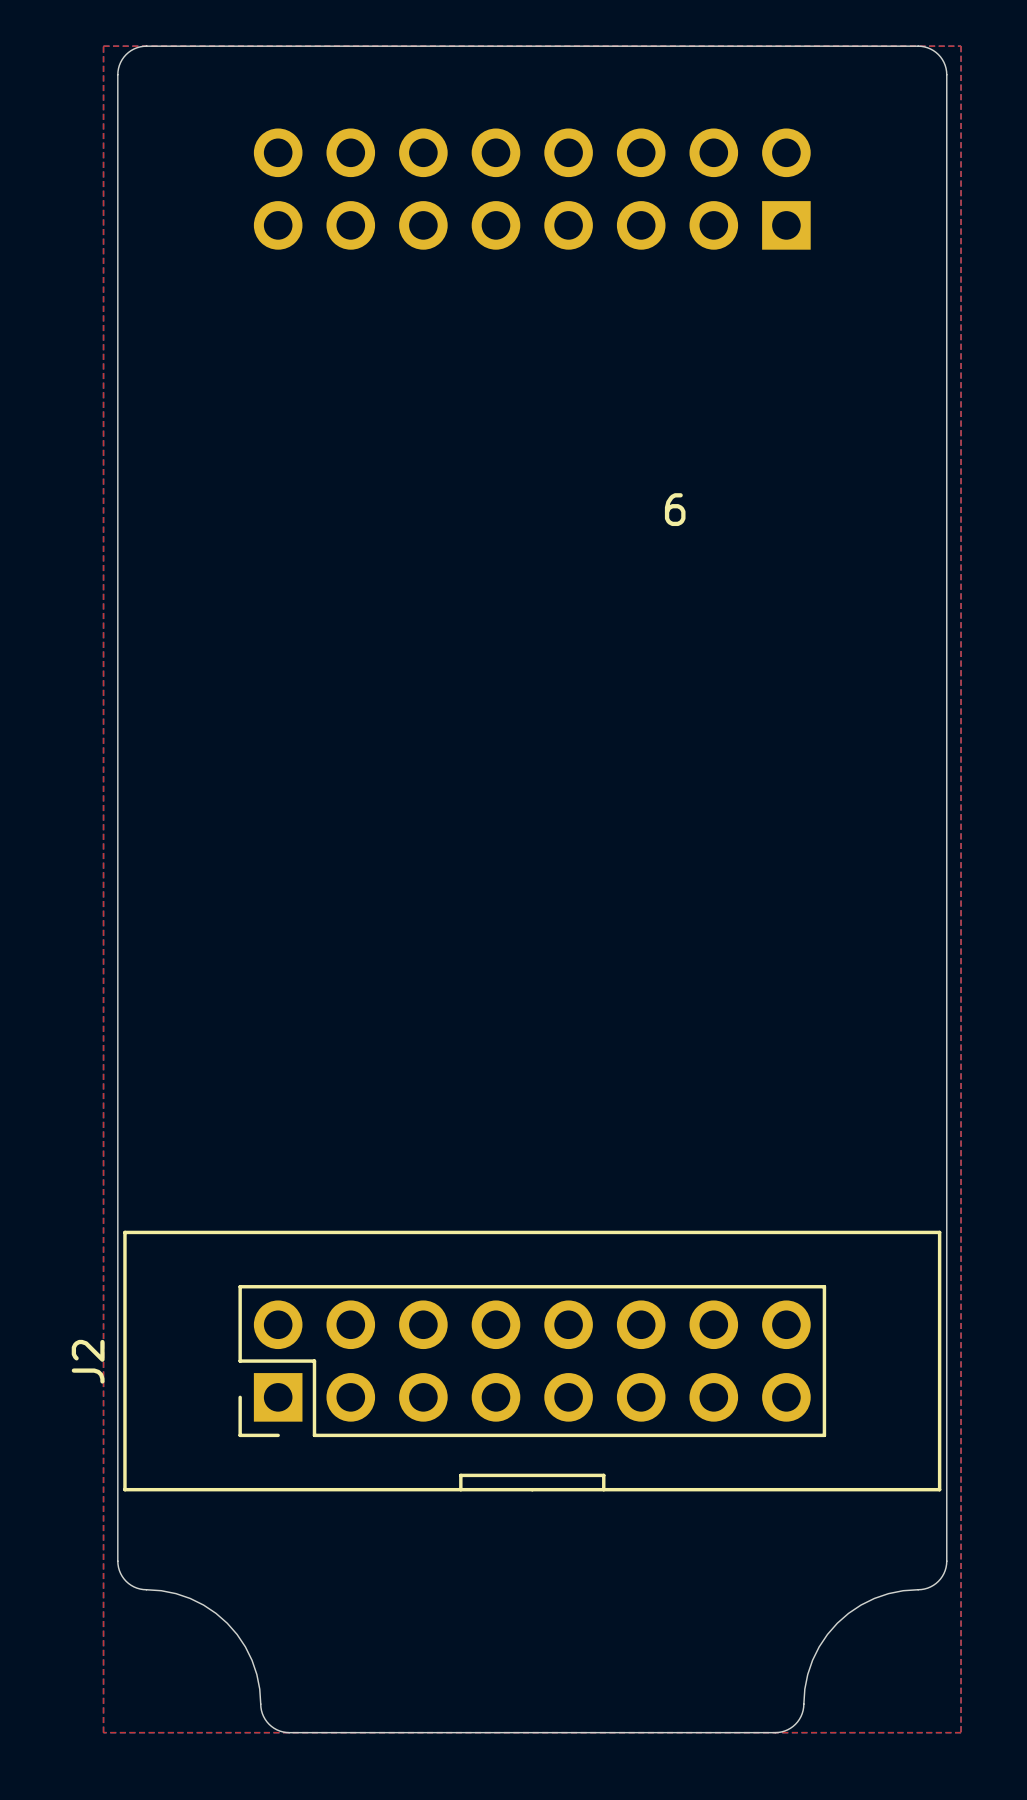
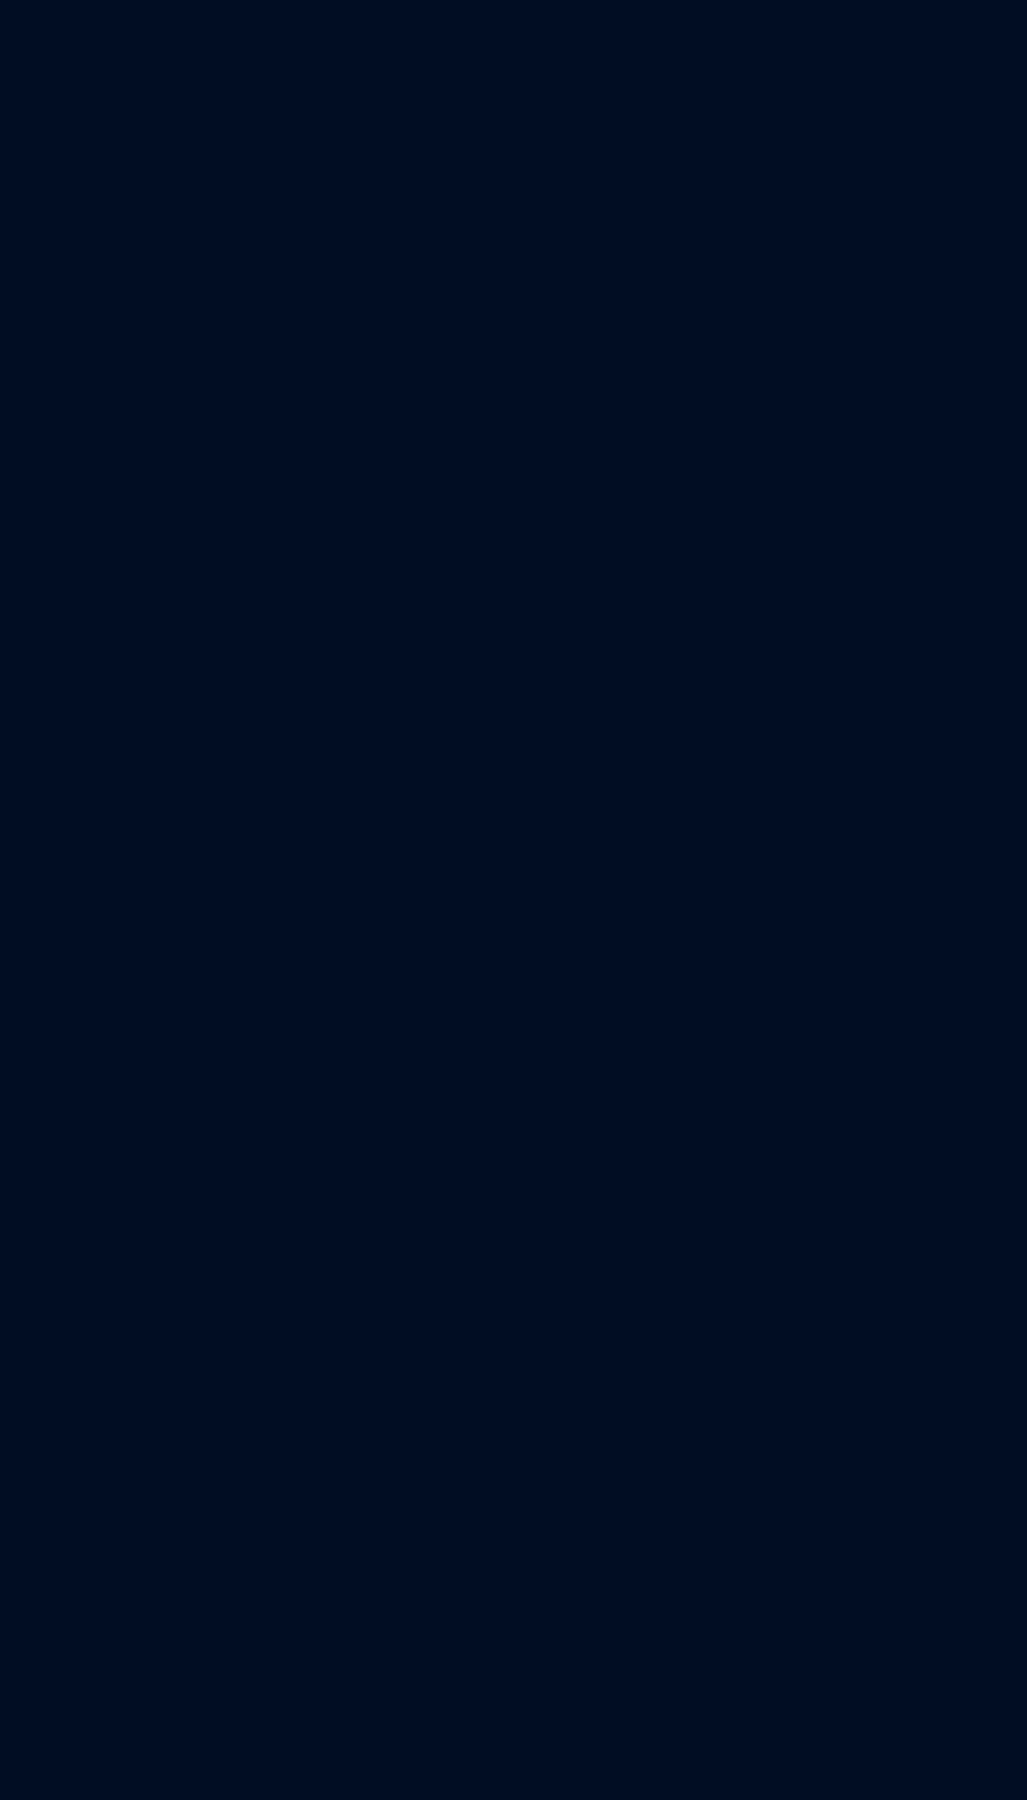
top zone outline: (103, 46) (103, 1732) (961, 1732) (961, 46) (103, 46) -> none
board edge: (146, 46) (918, 46) (927, 47) (936, 52) (945, 65) (946, 74) (946, 1564) (940, 1578) (930, 1586) (888, 1593) (874, 1598) (861, 1605) (837, 1623) (819, 1646) (812, 1660) (807, 1674) (801, 1716) (795, 1724) (784, 1731) (775, 1732) (282, 1731) (271, 1726) (263, 1716) (256, 1674) (252, 1660) (245, 1646) (227, 1623) (203, 1605) (190, 1598) (175, 1593) (134, 1586) (126, 1581) (119, 1570) (117, 1561) (117, 74) (120, 62) (126, 54) (134, 49) (146, 46) -> none
part: (532, 189) -> none
text: 6 (675, 509) -> none
J2: (532, 1361) -> none

